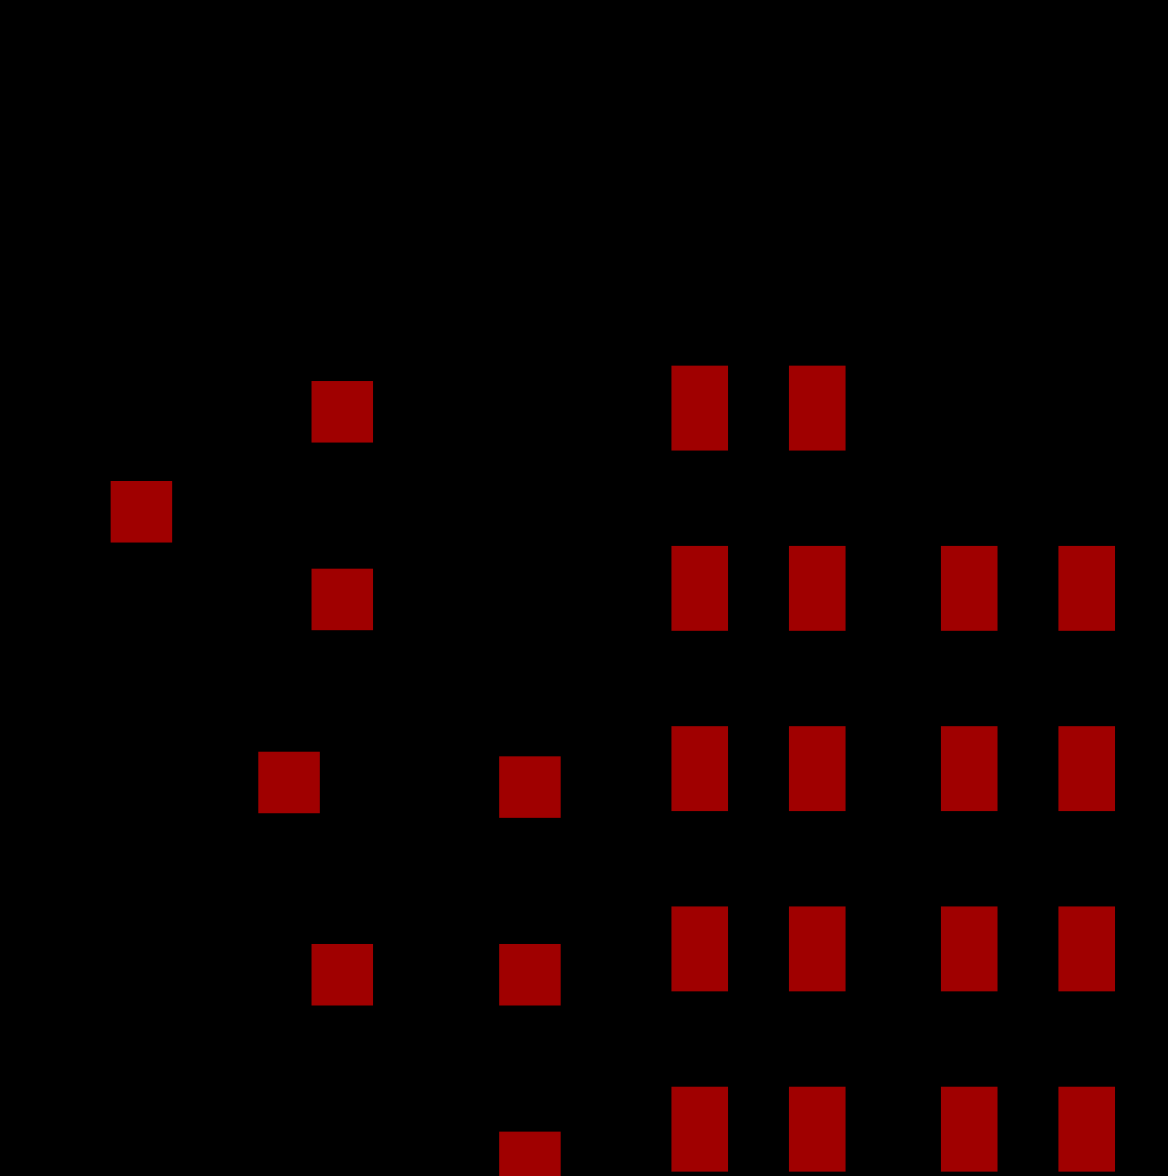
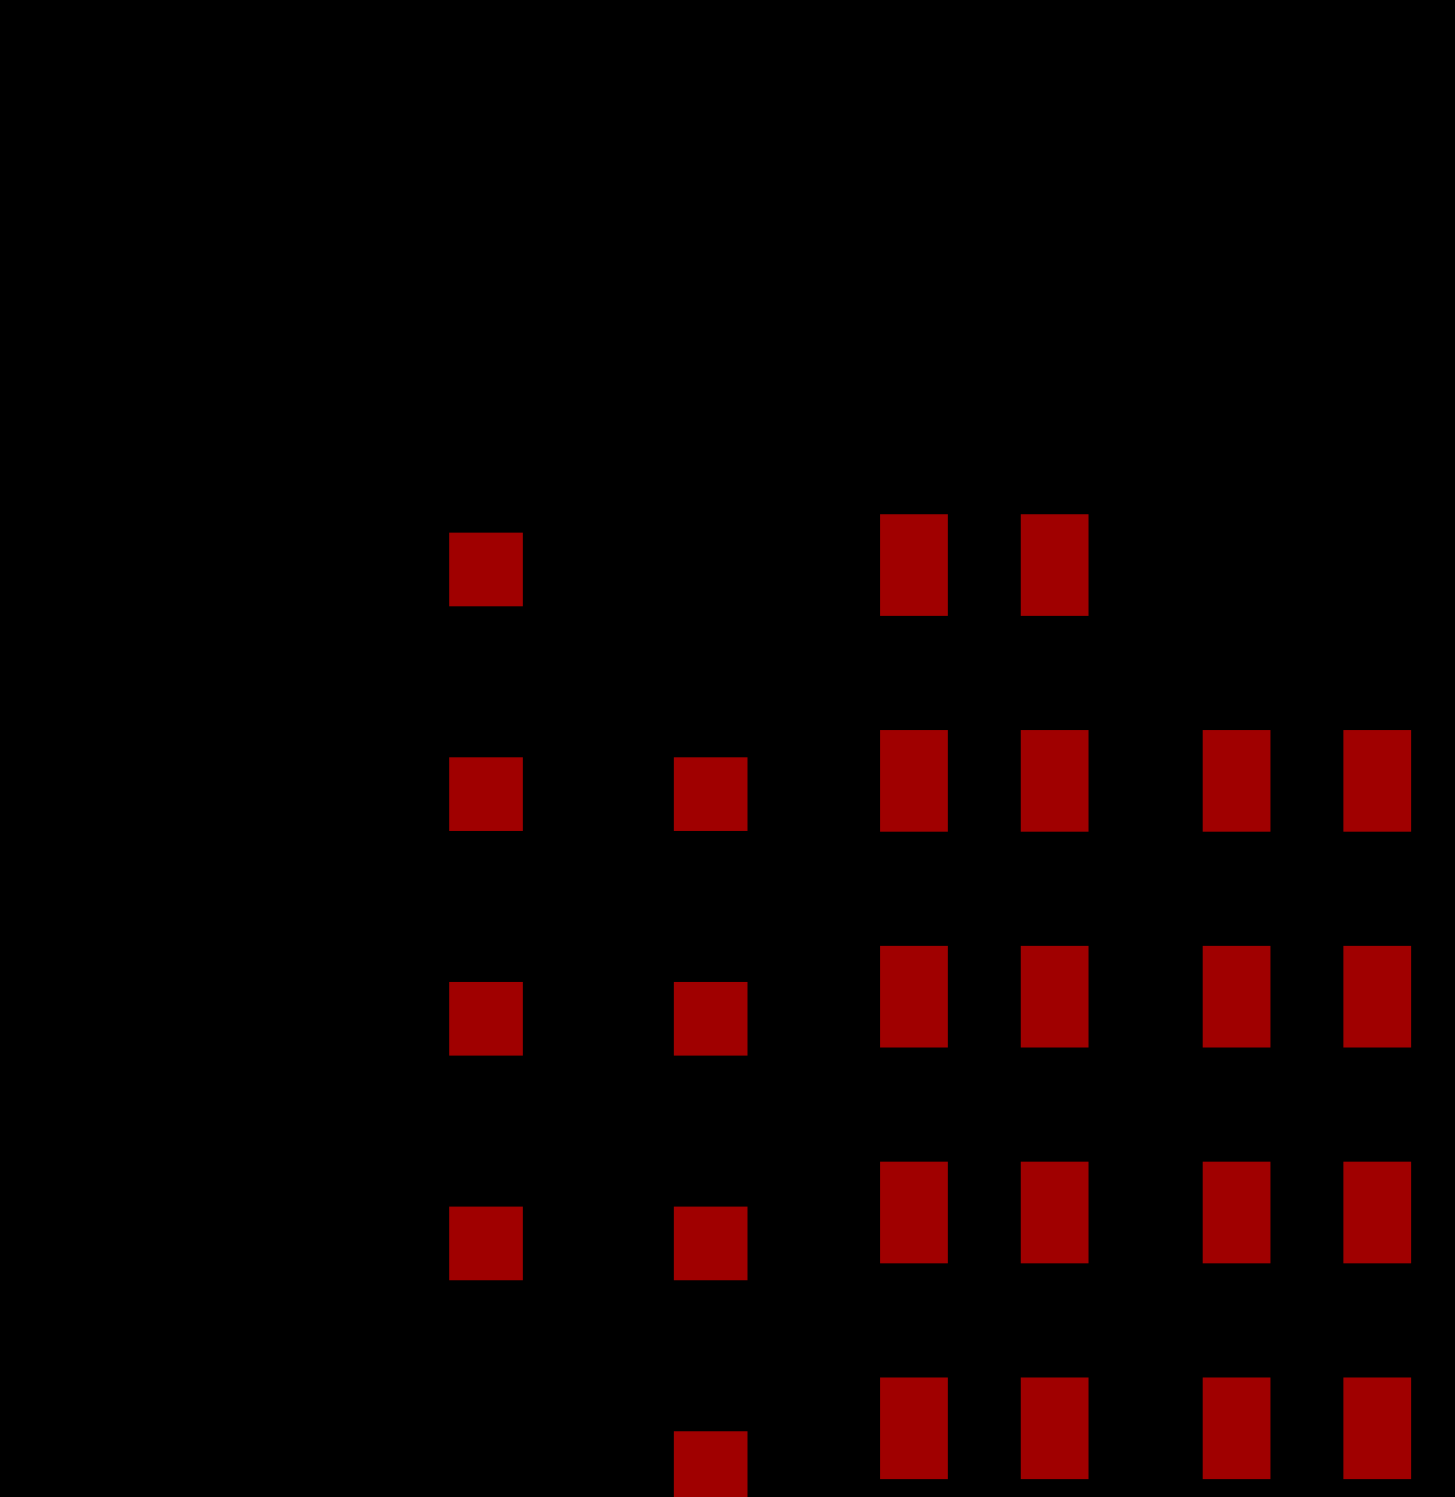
part position: (141, 511) -> (710, 794)
part position: (289, 782) -> (486, 1018)

